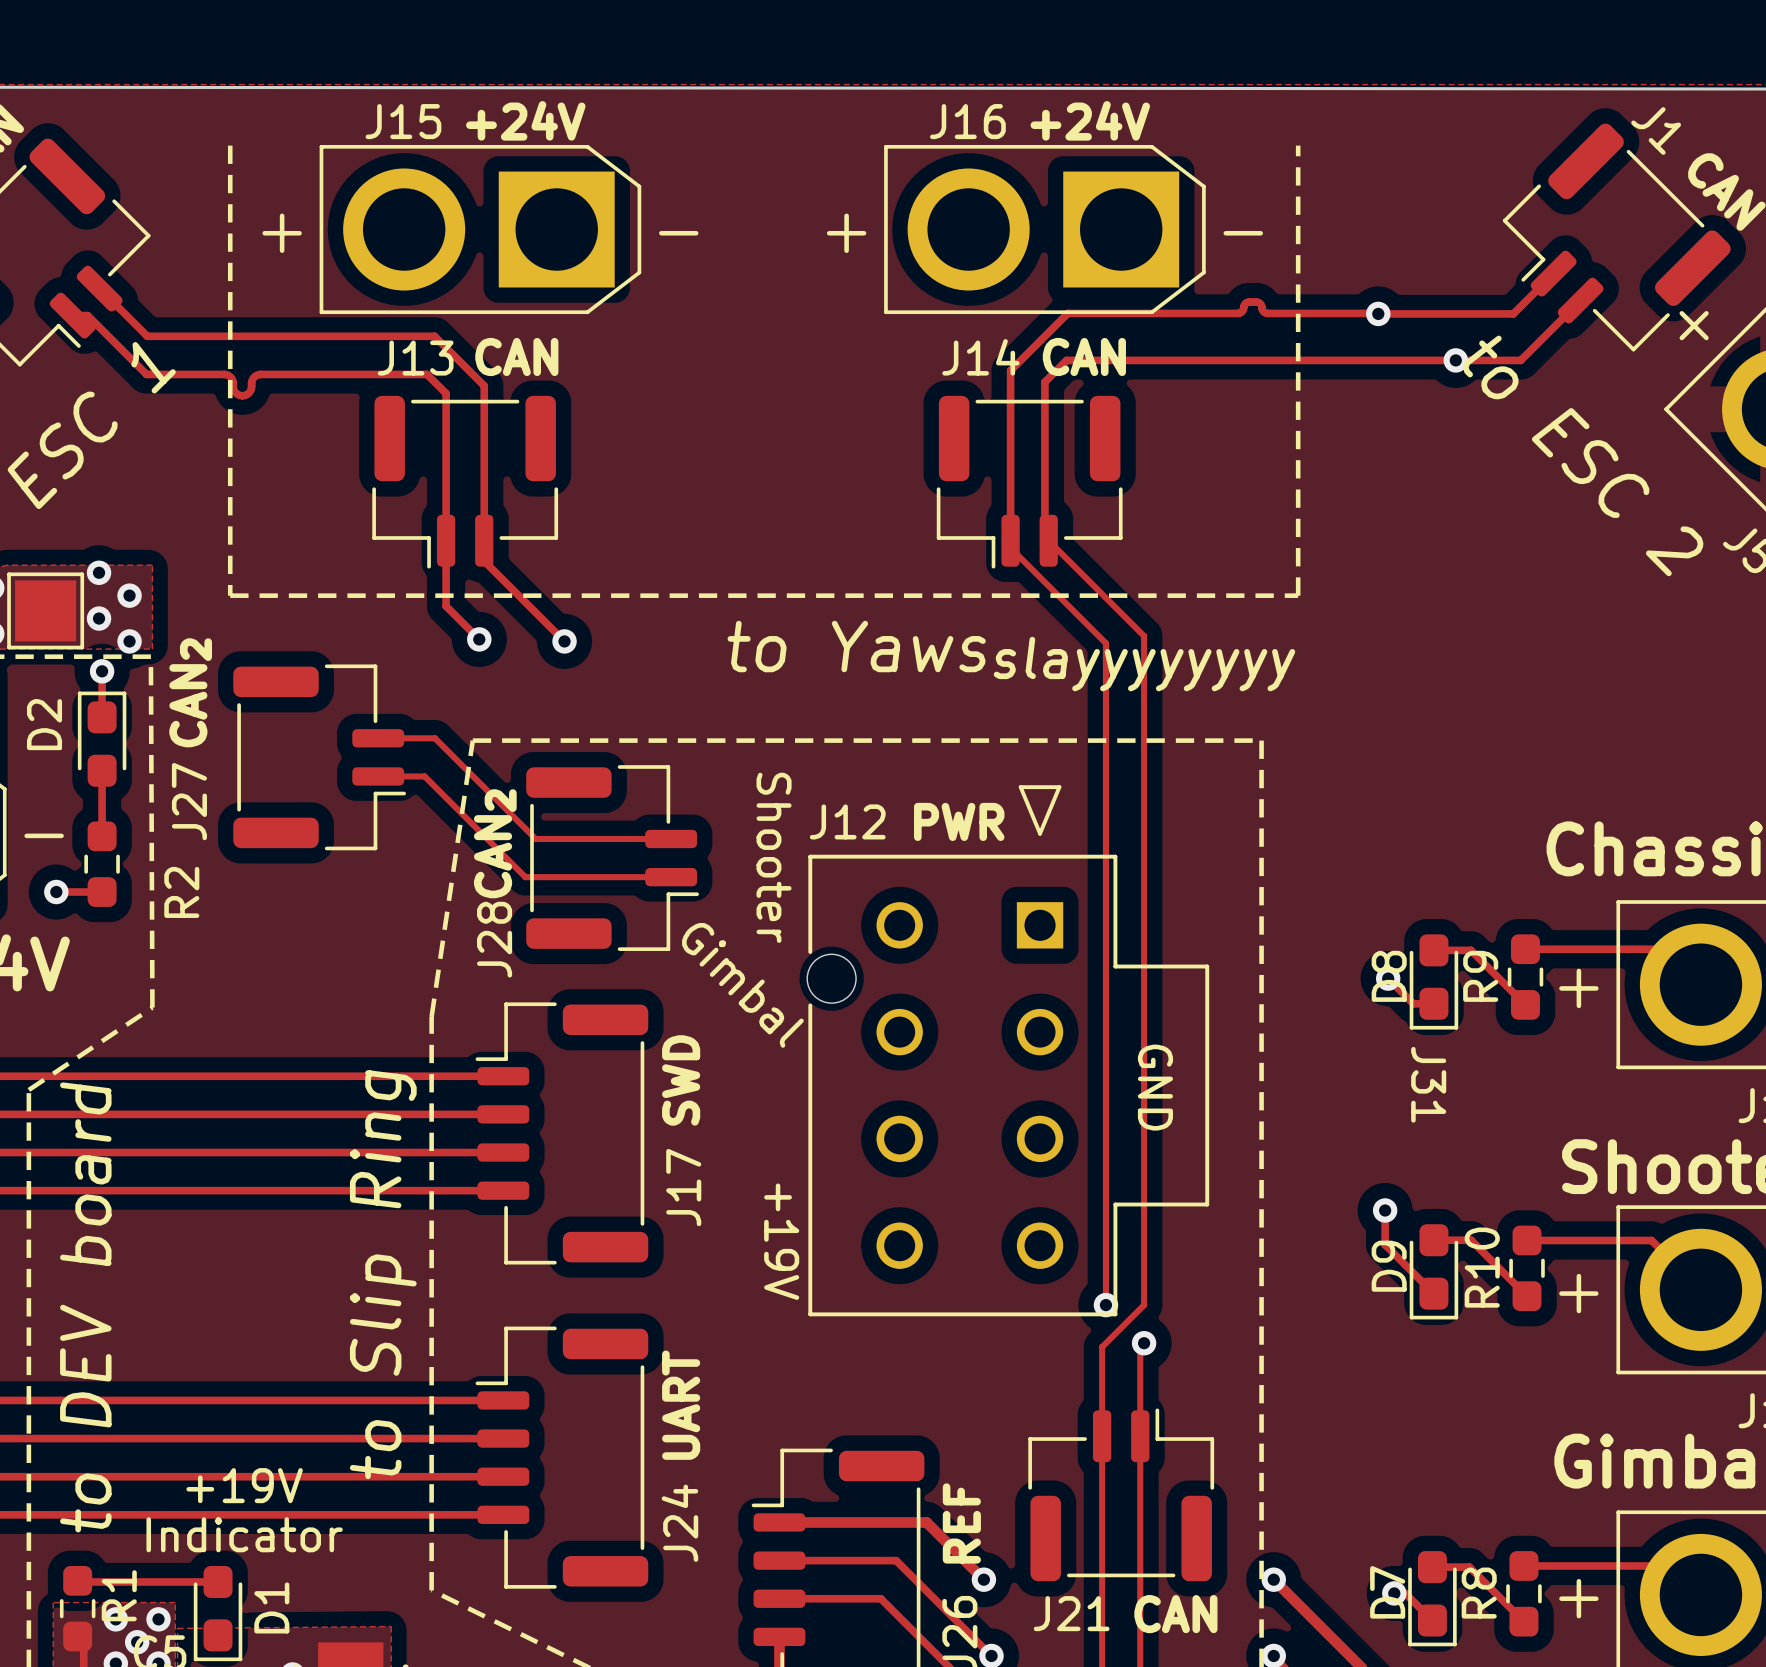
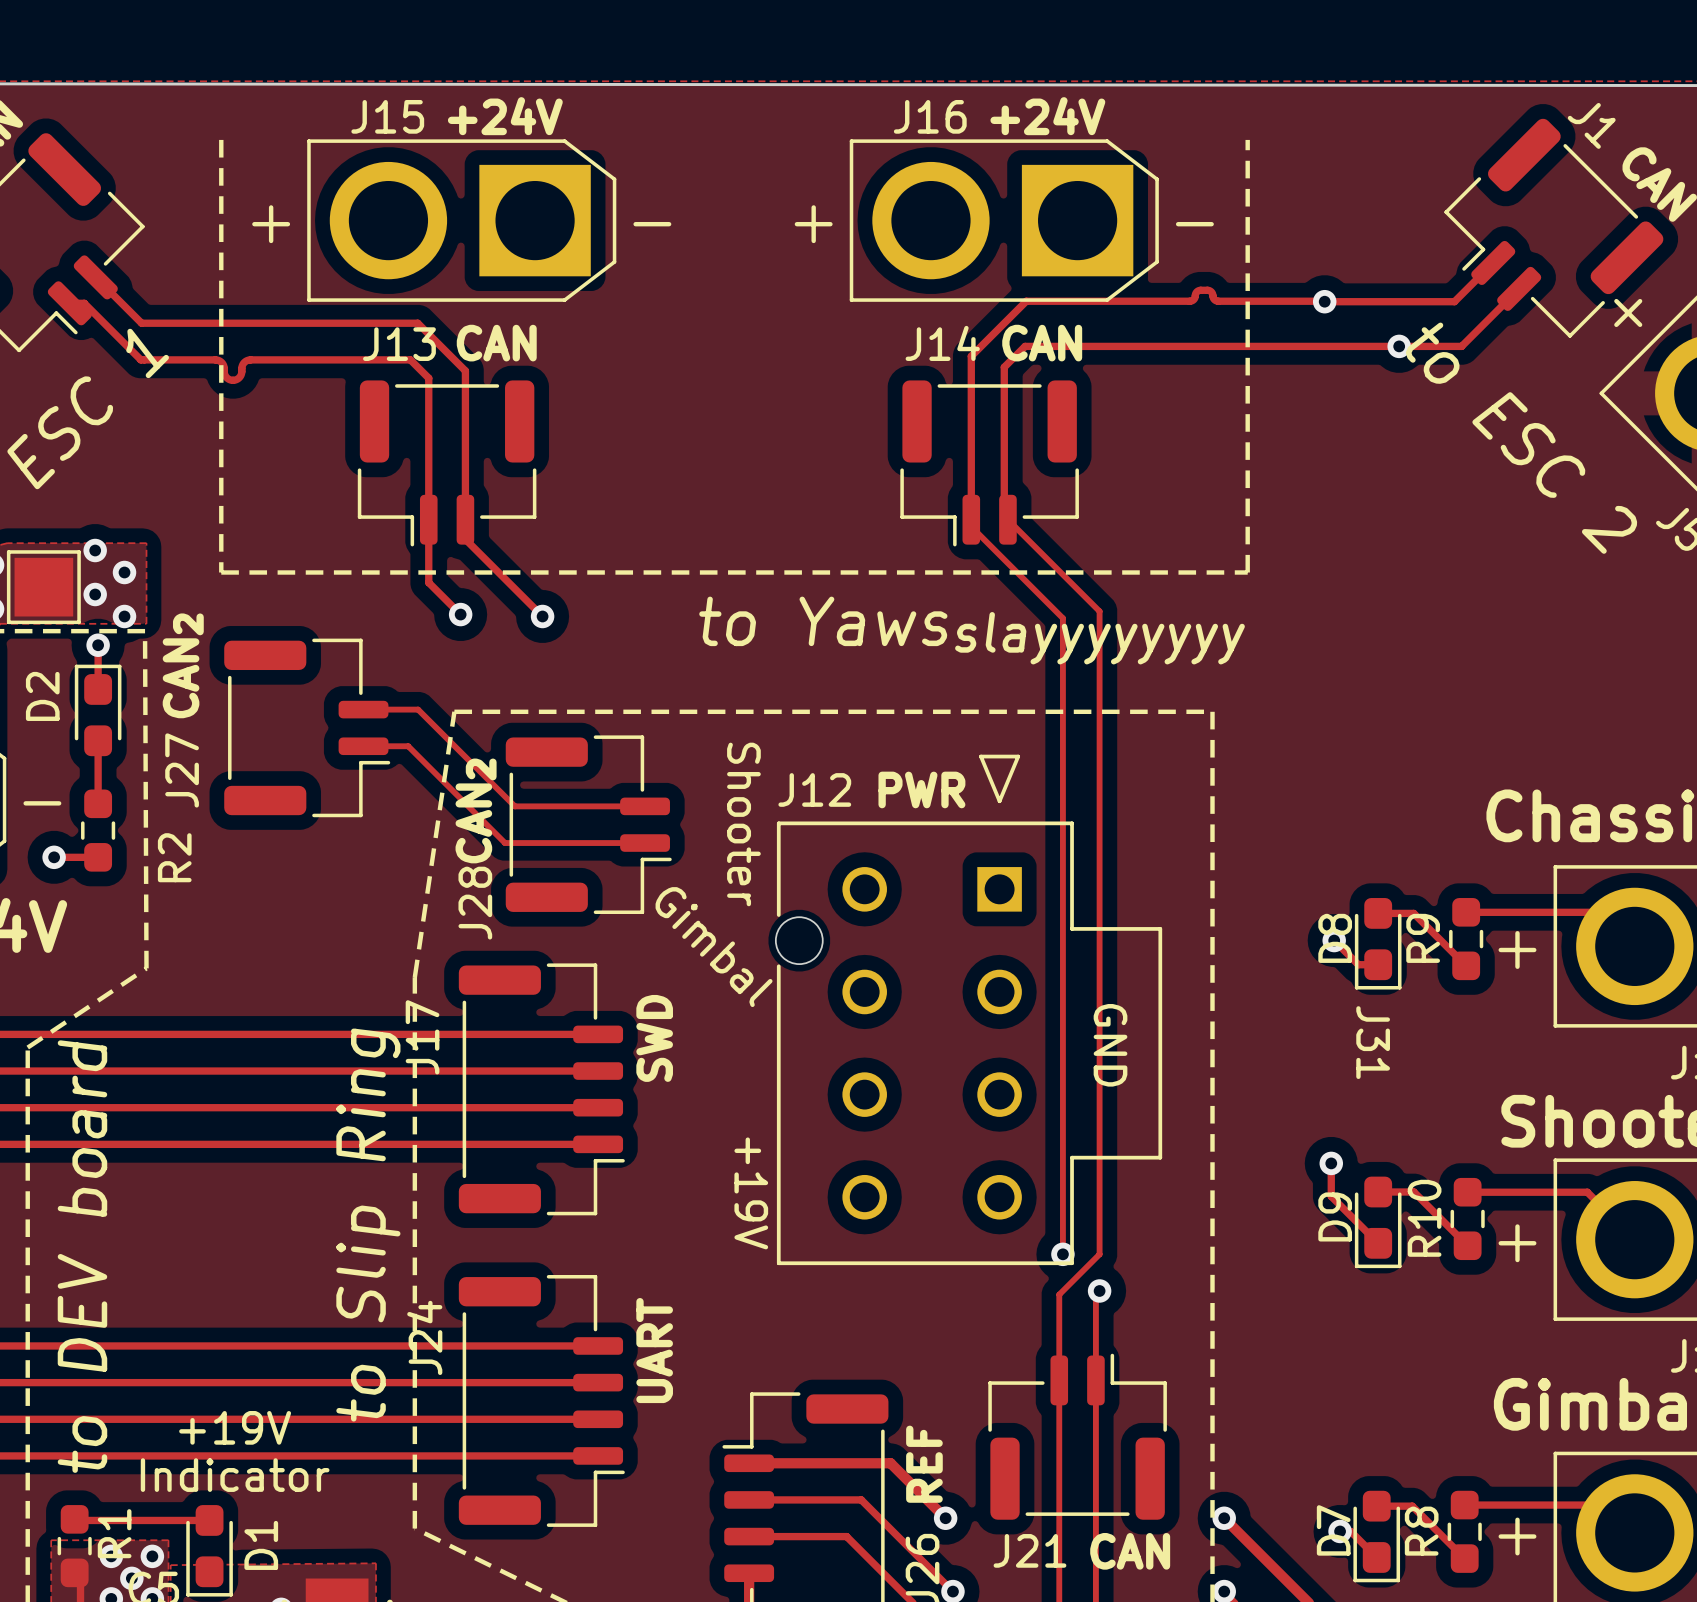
track: none -> (483, 1034) (598, 1034)
track: none -> (483, 1071) (598, 1071)
J17 rotation: 0° (561, 1133) -> 180° (541, 1089)
track: none -> (483, 1107) (598, 1107)
track: none -> (483, 1144) (598, 1144)
track: none -> (483, 1345) (598, 1345)
track: none -> (483, 1382) (598, 1382)
J24 rotation: 0° (561, 1457) -> 180° (541, 1400)
track: none -> (483, 1419) (598, 1419)
track: none -> (483, 1455) (598, 1455)

